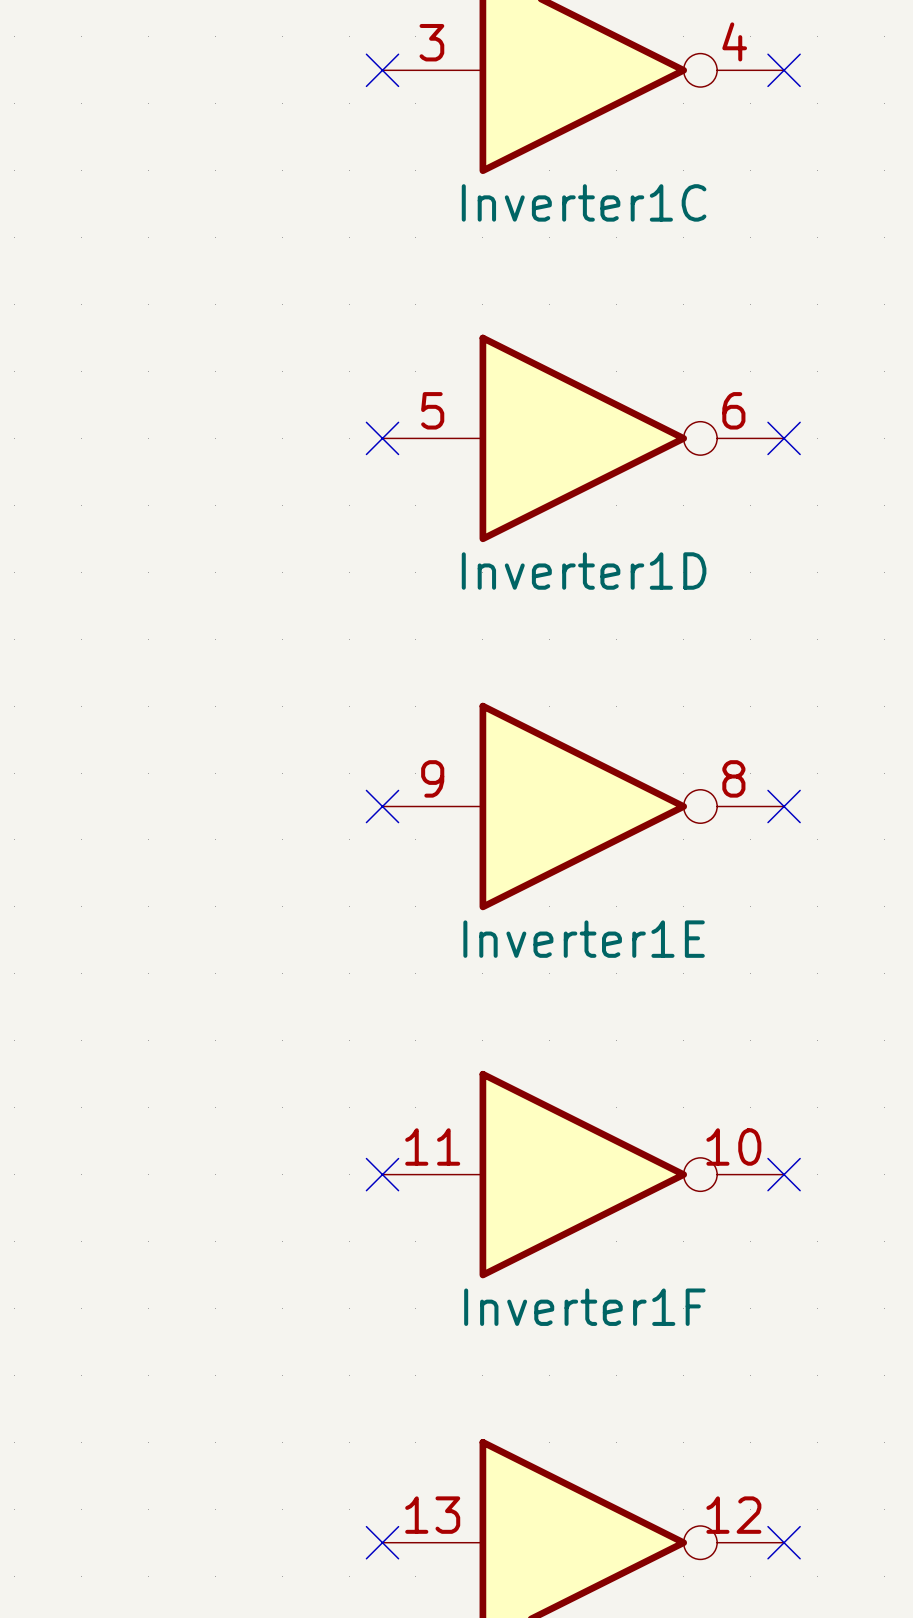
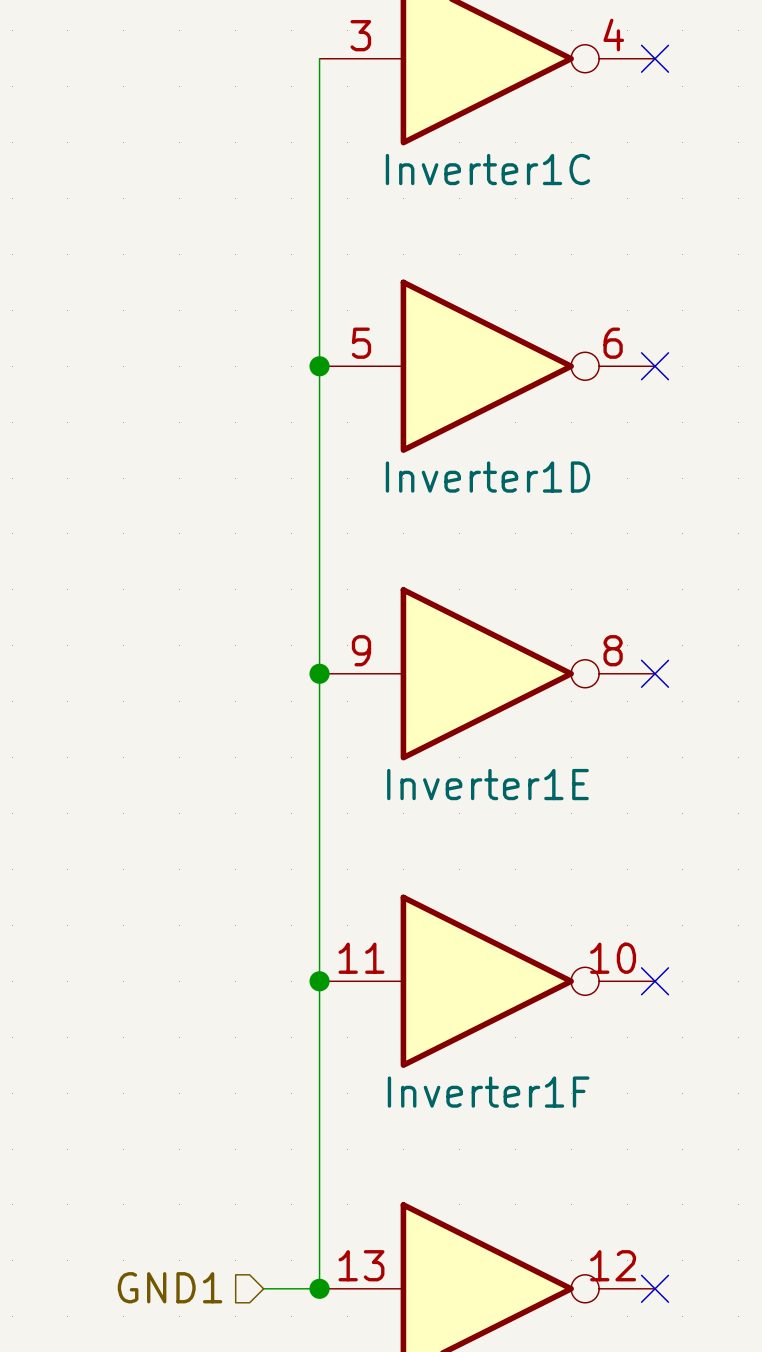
wire: none -> (319, 58) (319, 1288) (263, 1288)
no-connect mark: (382, 70) -> none
no-connect mark: (382, 438) -> none
junction: none -> (319, 366)
no-connect mark: (382, 806) -> none
junction: none -> (319, 673)
no-connect mark: (382, 1174) -> none
junction: none -> (319, 981)
hierarchical label: none -> GND1 (170, 1287)
no-connect mark: (382, 1542) -> none
junction: none -> (319, 1288)

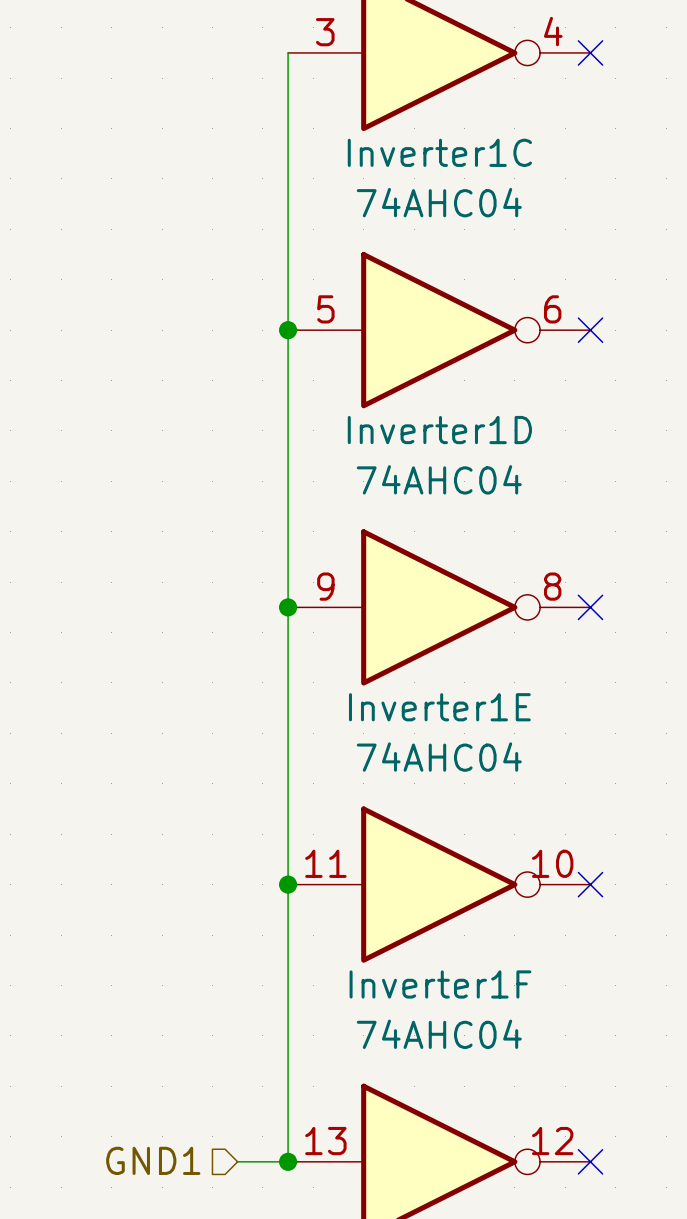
Inverter1C value: none -> 74AHC04 (439, 202)
Inverter1D value: none -> 74AHC04 (439, 479)
Inverter1E value: none -> 74AHC04 (439, 757)
Inverter1F value: none -> 74AHC04 (439, 1034)

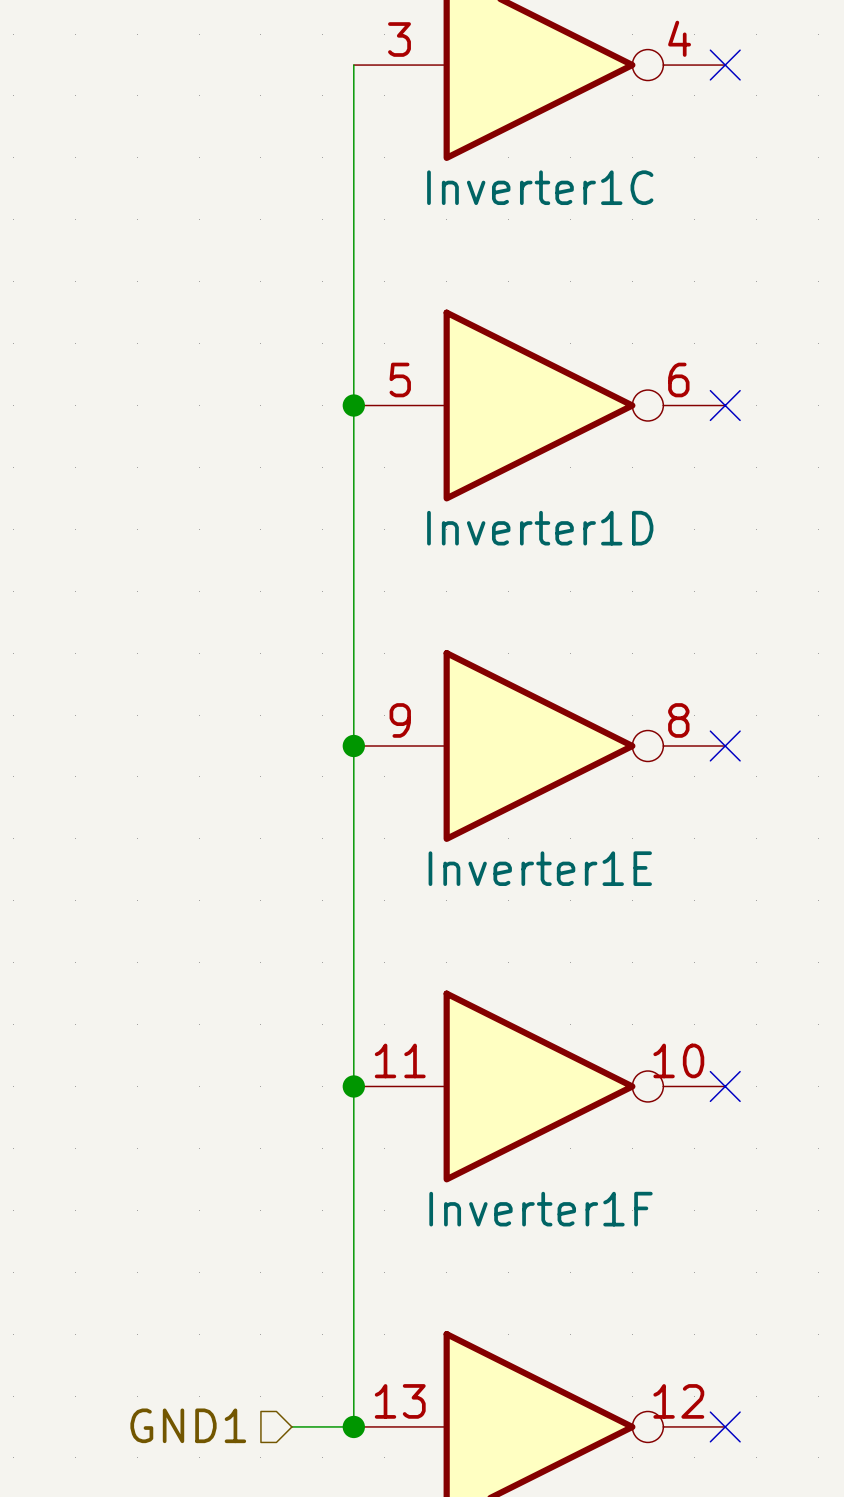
Inverter1C value: 74AHC04 (439, 202) -> none
Inverter1D value: 74AHC04 (439, 479) -> none
Inverter1E value: 74AHC04 (439, 757) -> none
Inverter1F value: 74AHC04 (439, 1034) -> none

